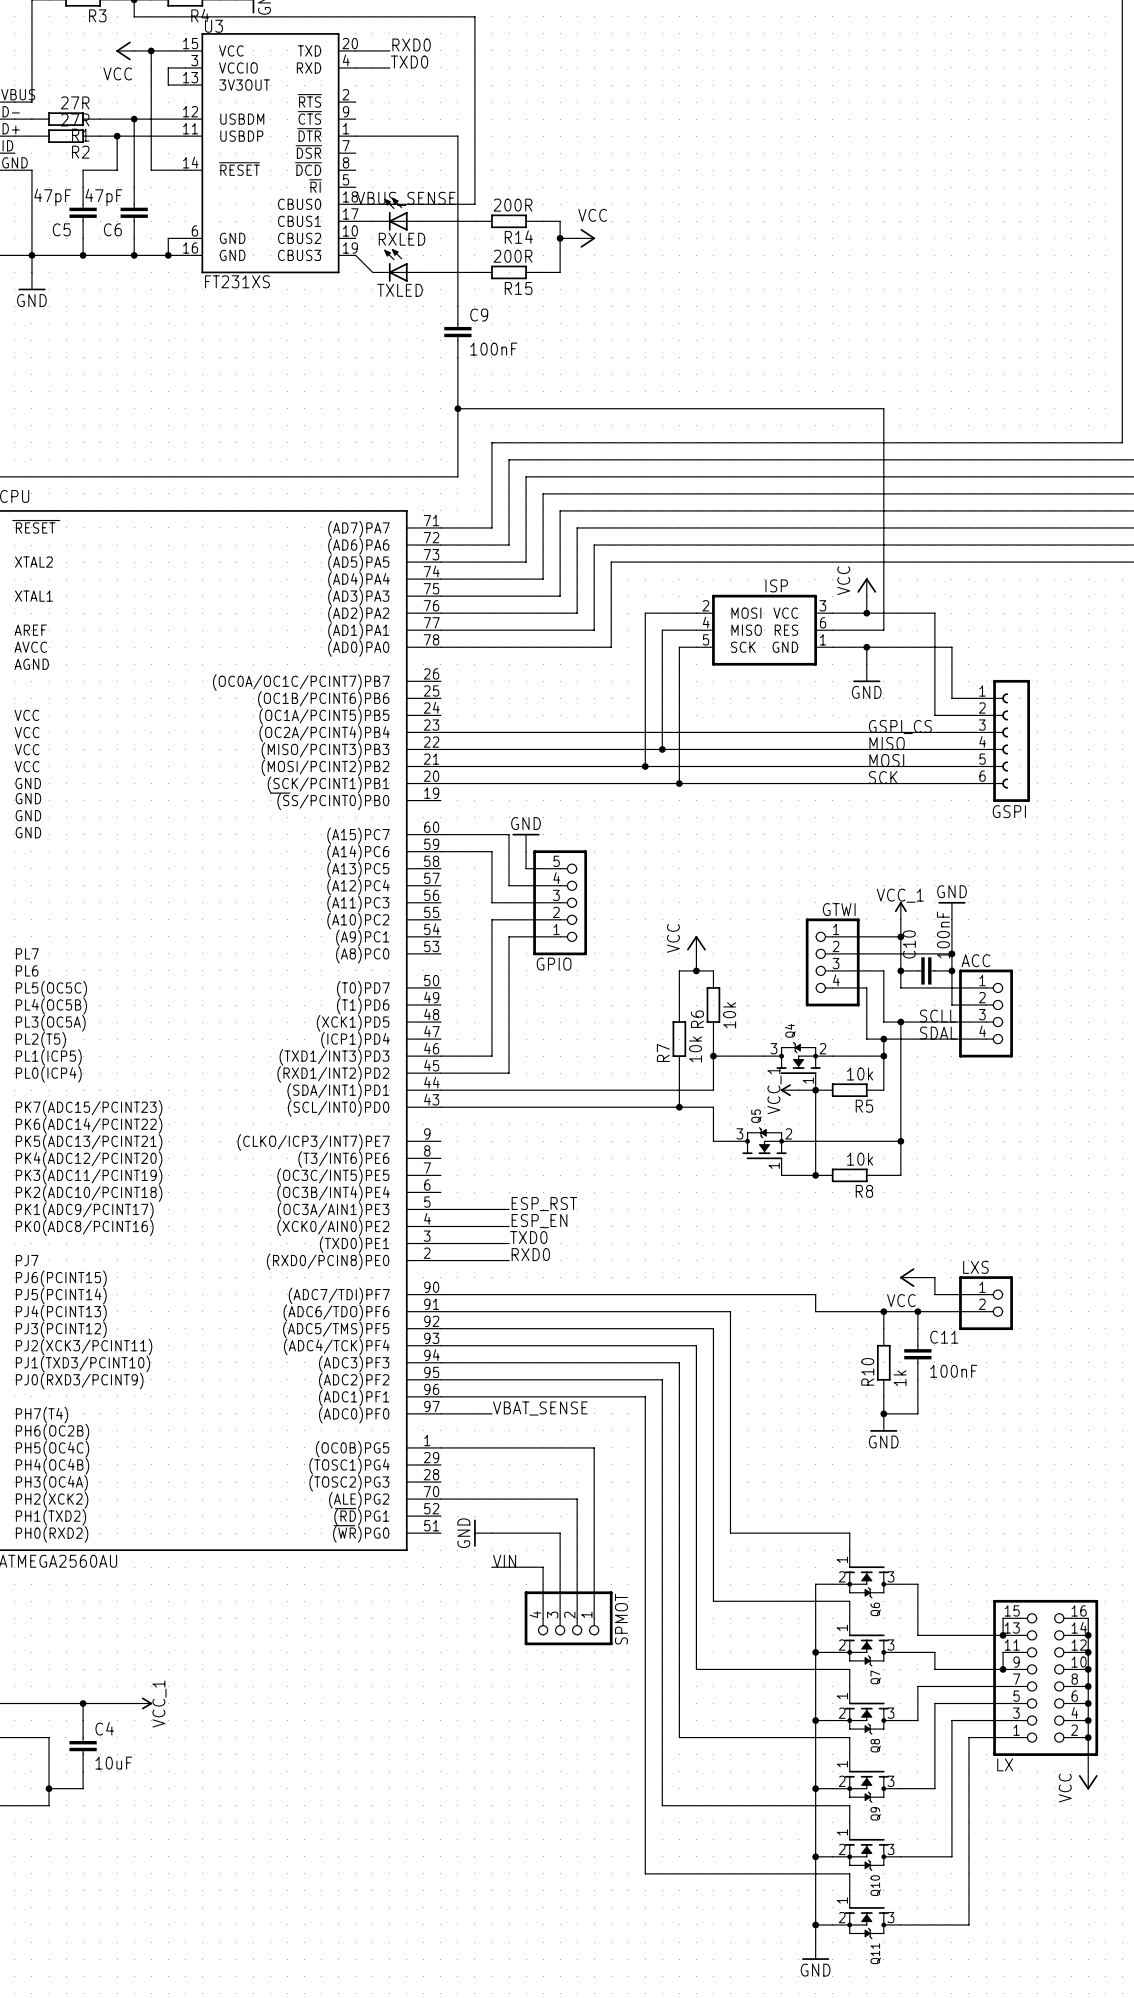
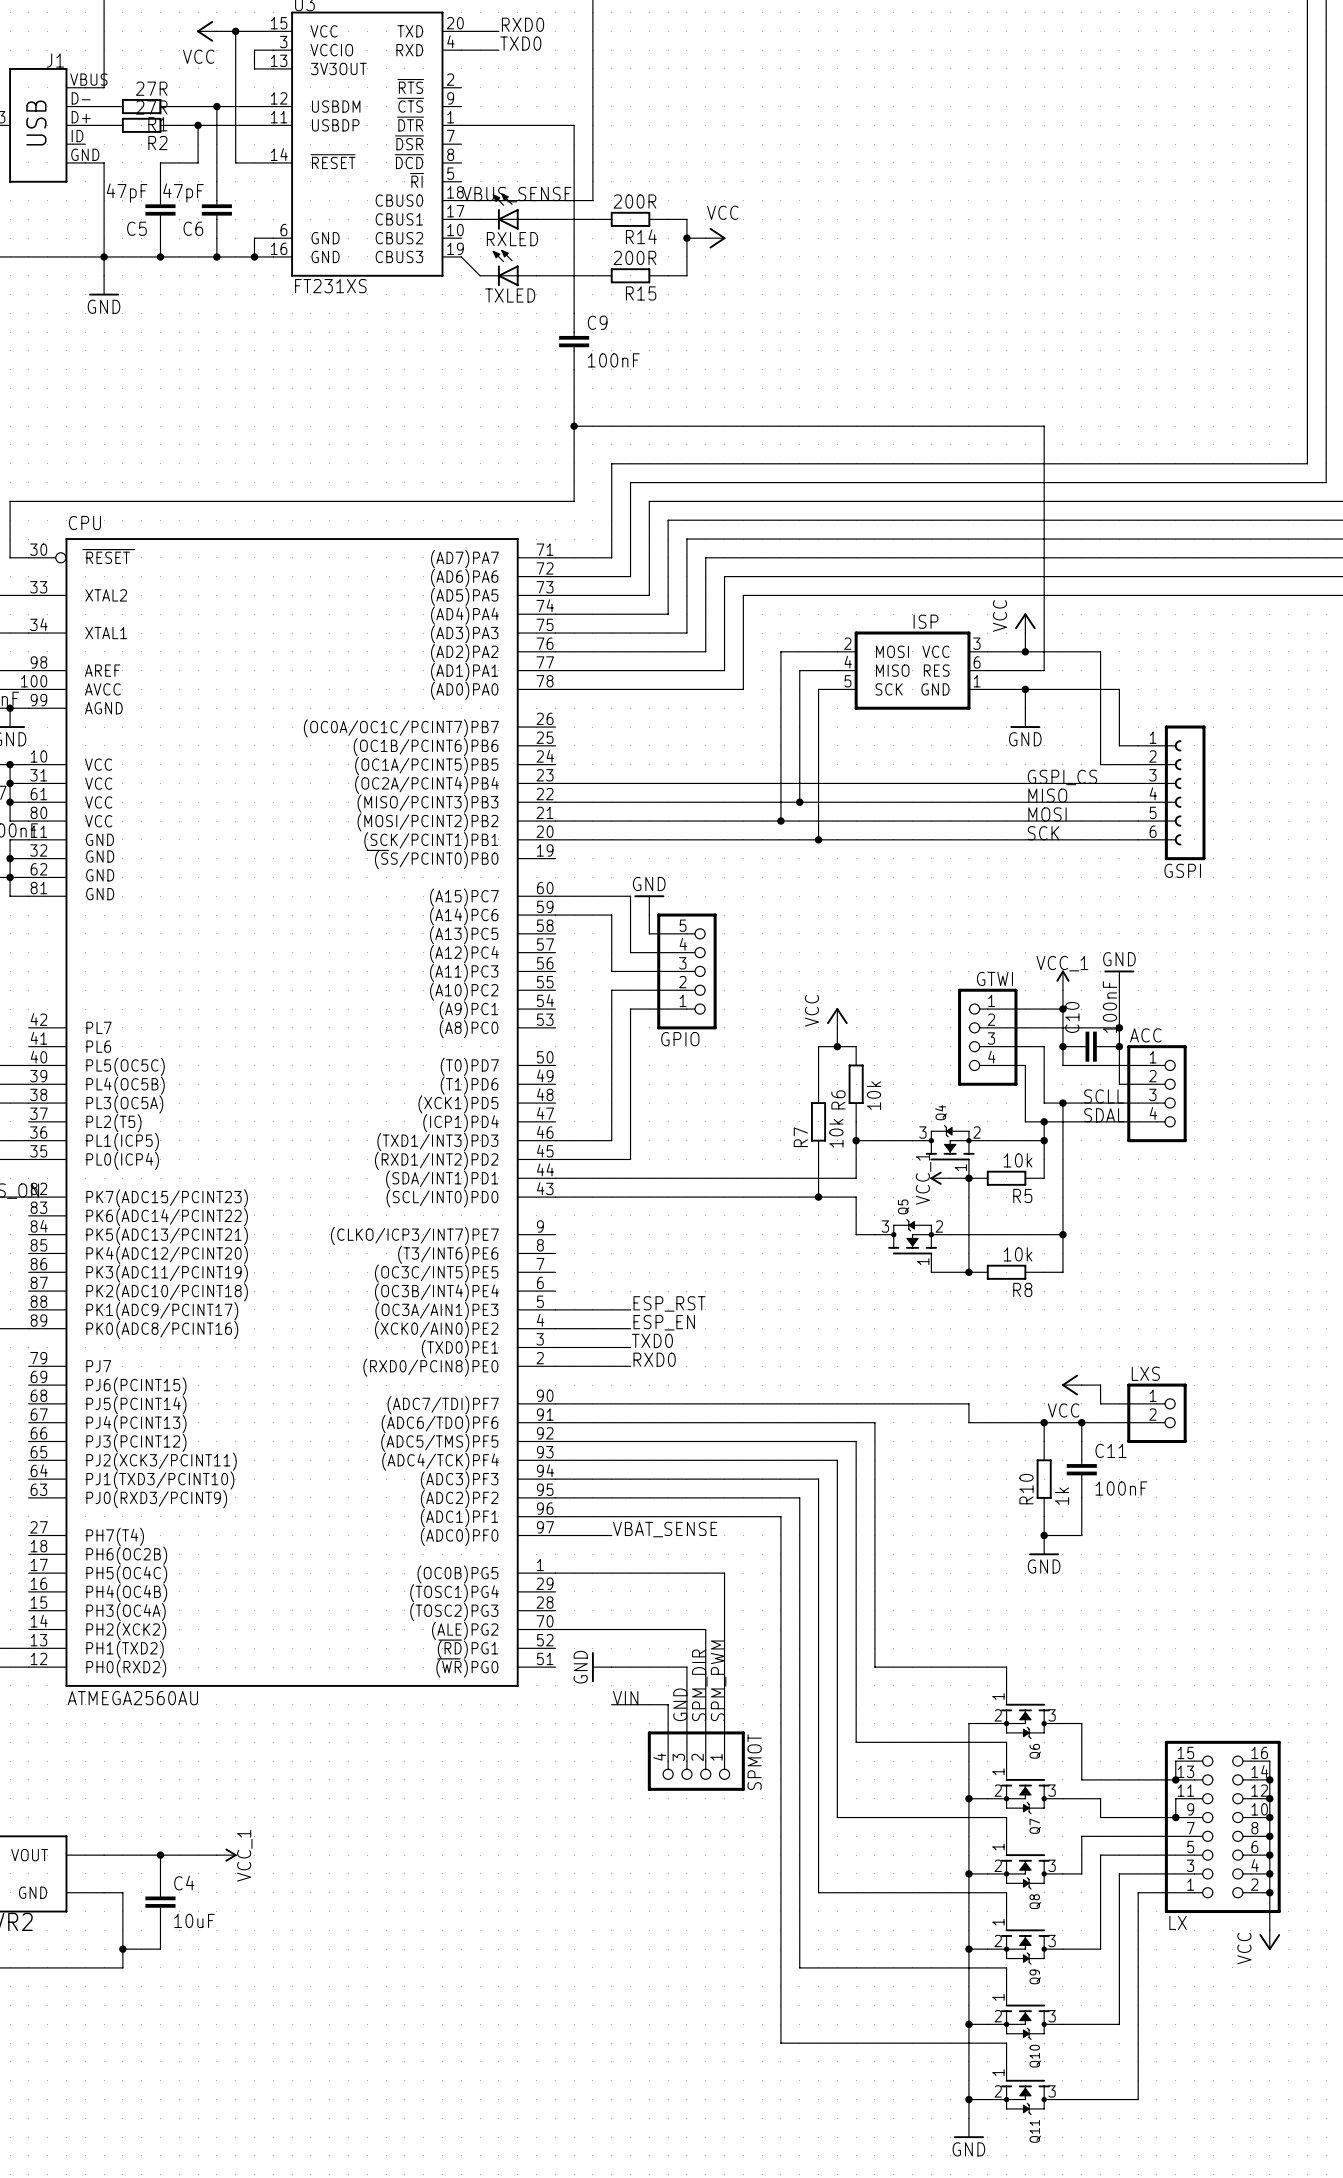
label: none -> SPM_PWM (718, 1680)
label: none -> SPM_DIR (699, 1685)
label: none -> GND (680, 1704)

